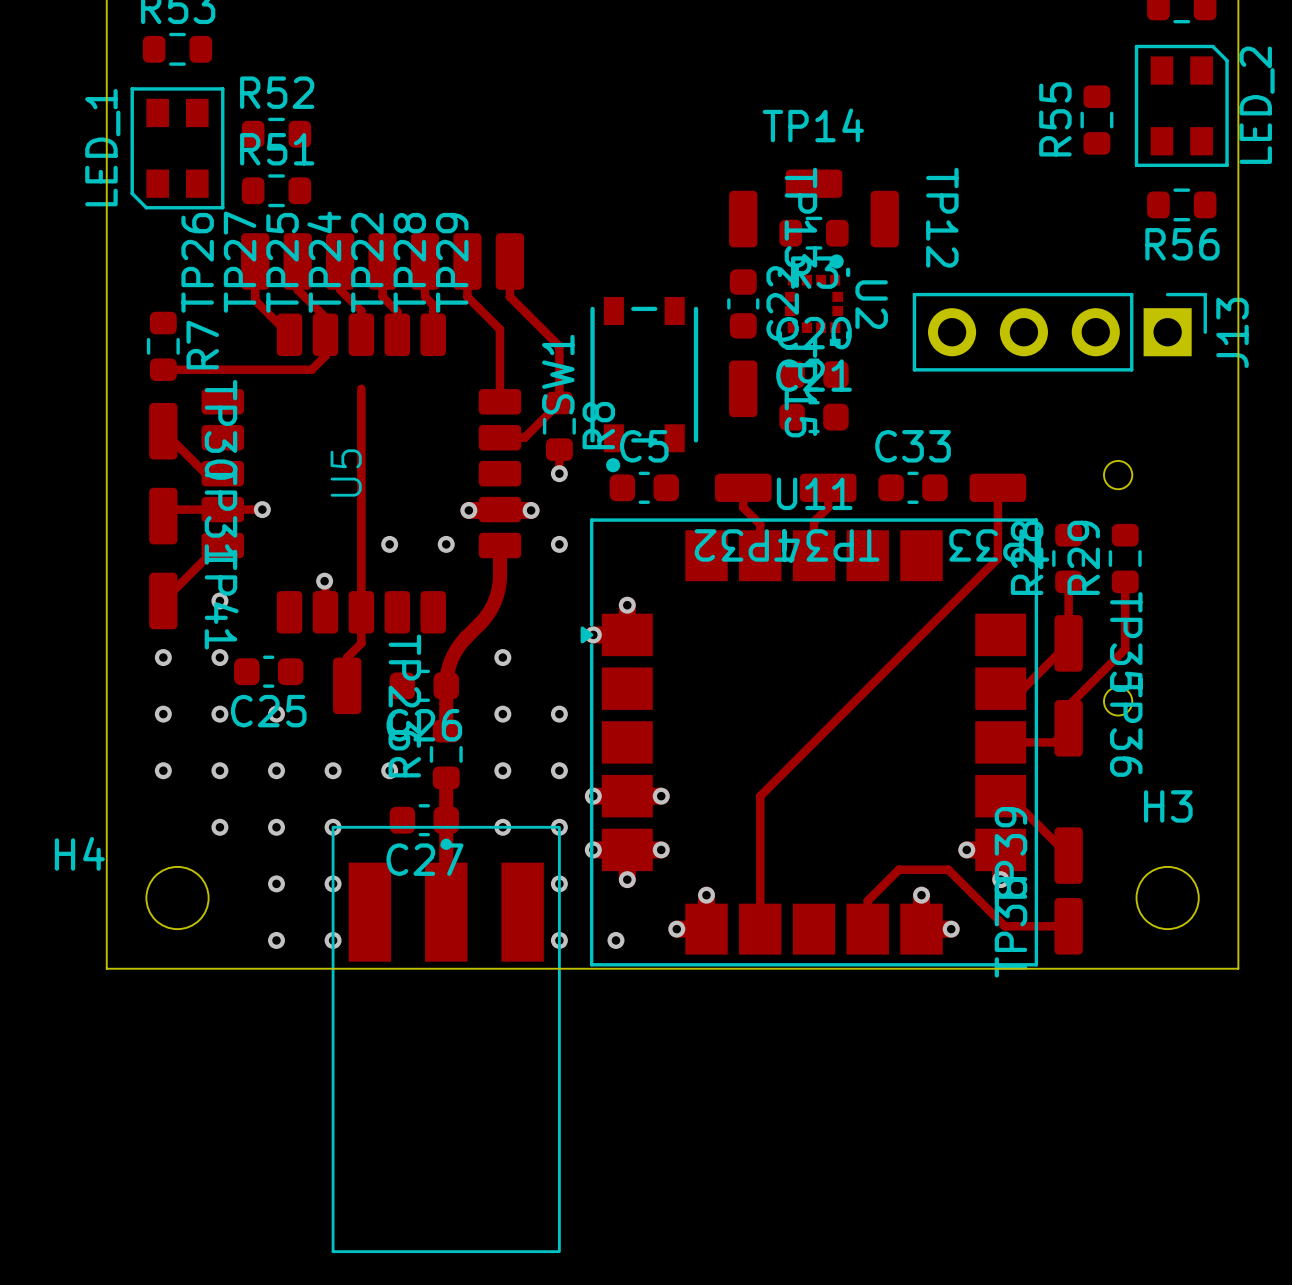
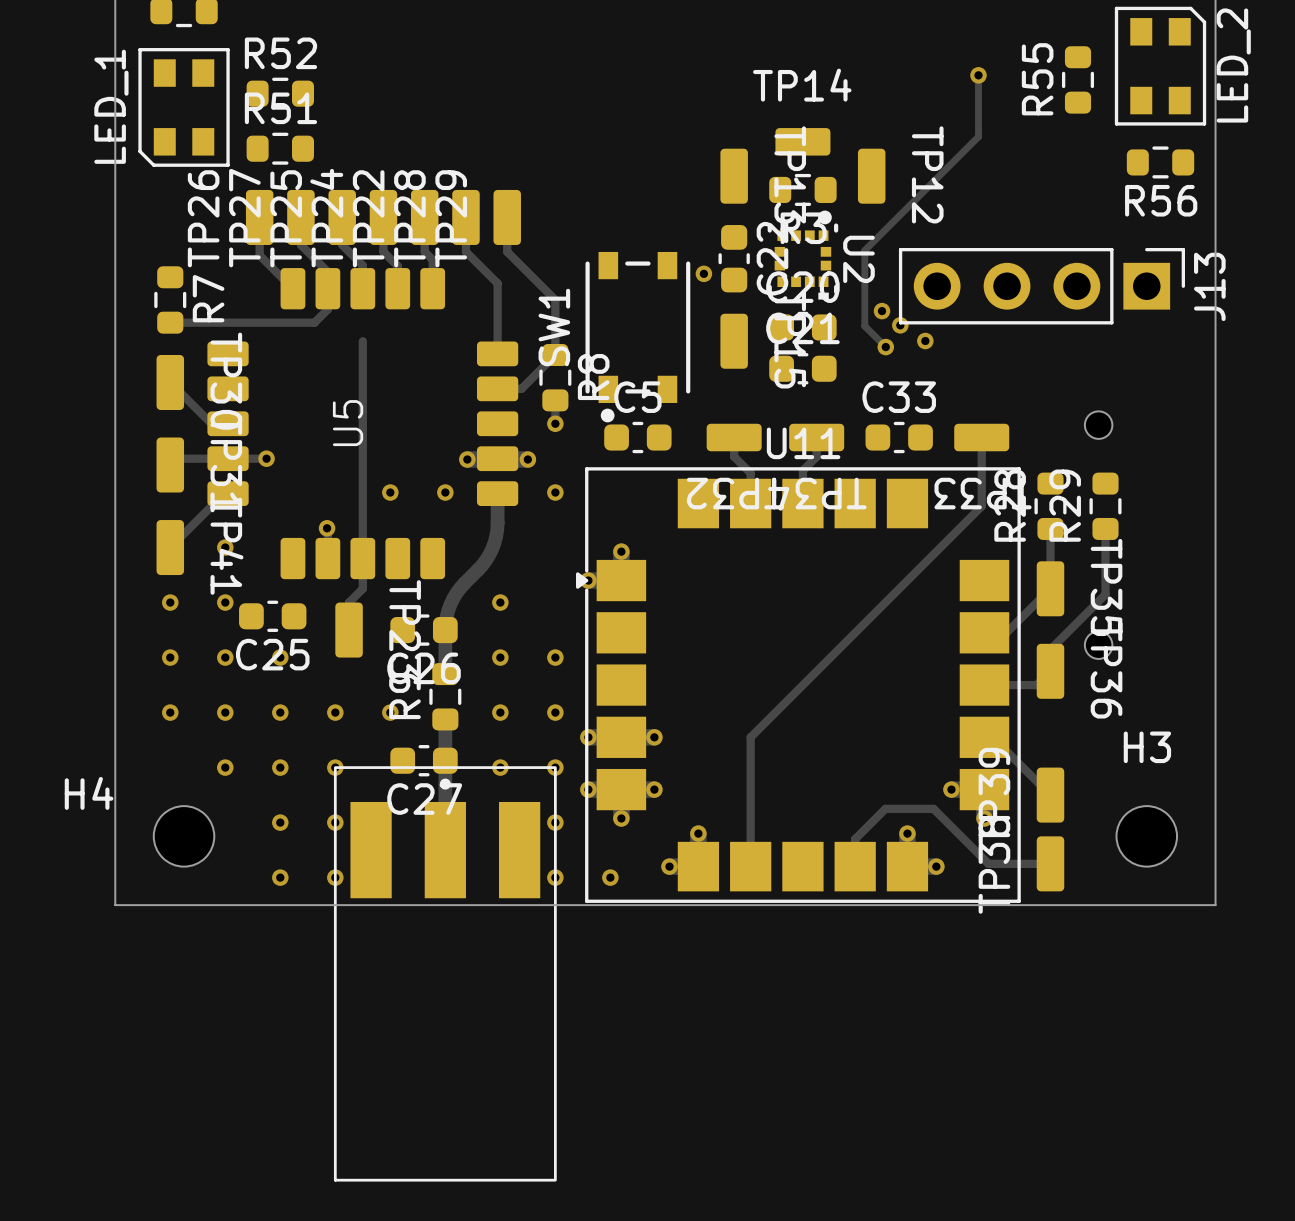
track: none -> (978, 75) (978, 136) (864, 250) (864, 326) (885, 347)
via: none -> (978, 75)
via: none -> (703, 273)
via: none -> (882, 311)
via: none -> (900, 325)
via: none -> (925, 341)
via: none -> (885, 347)

